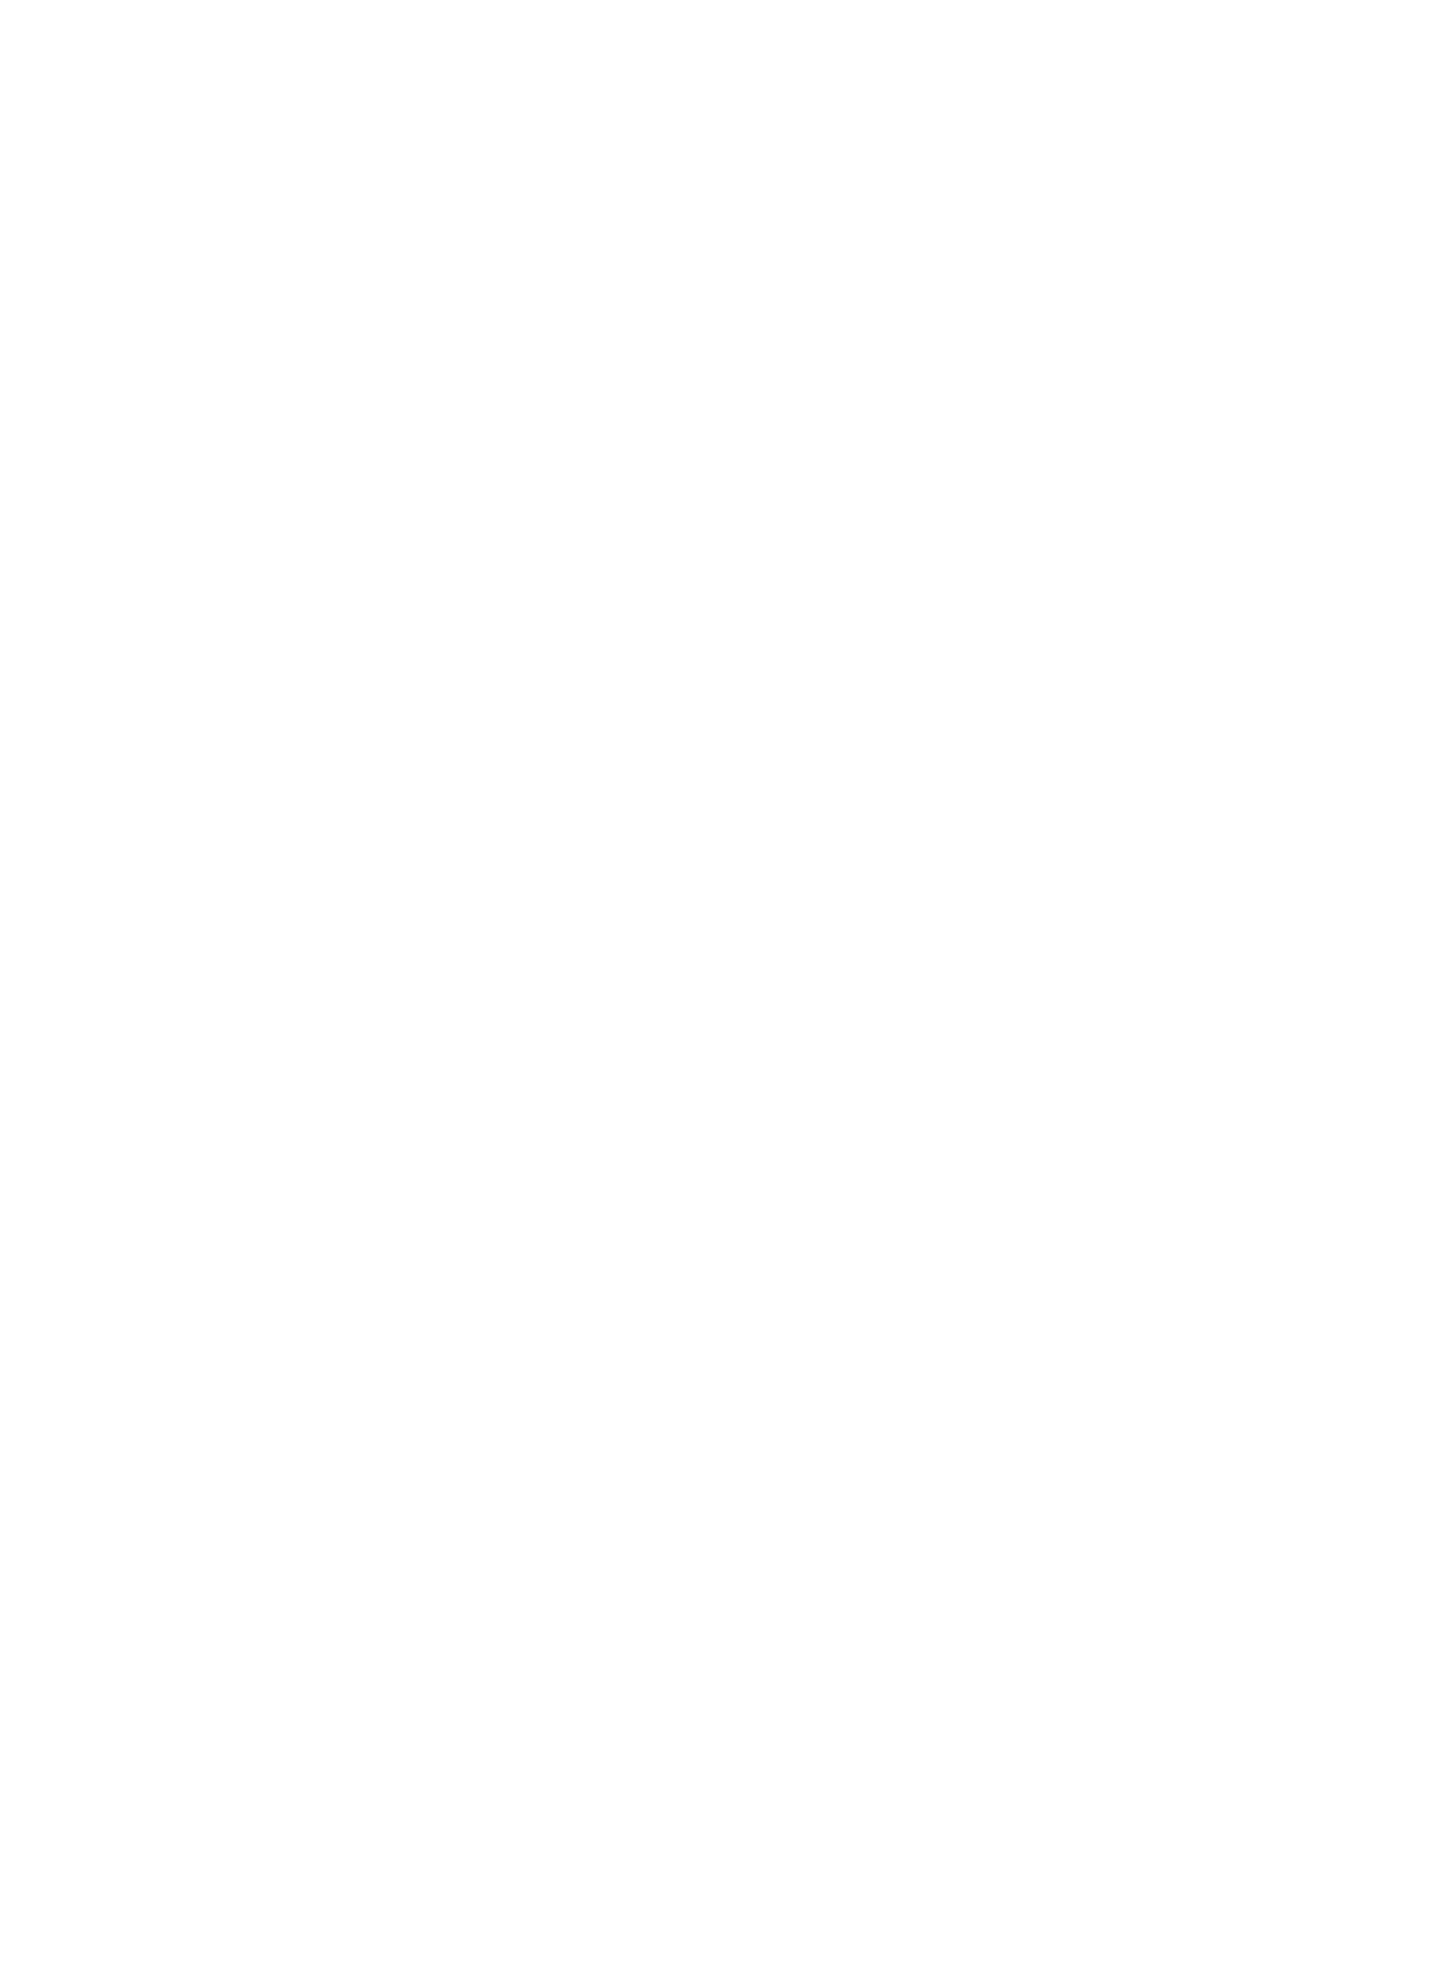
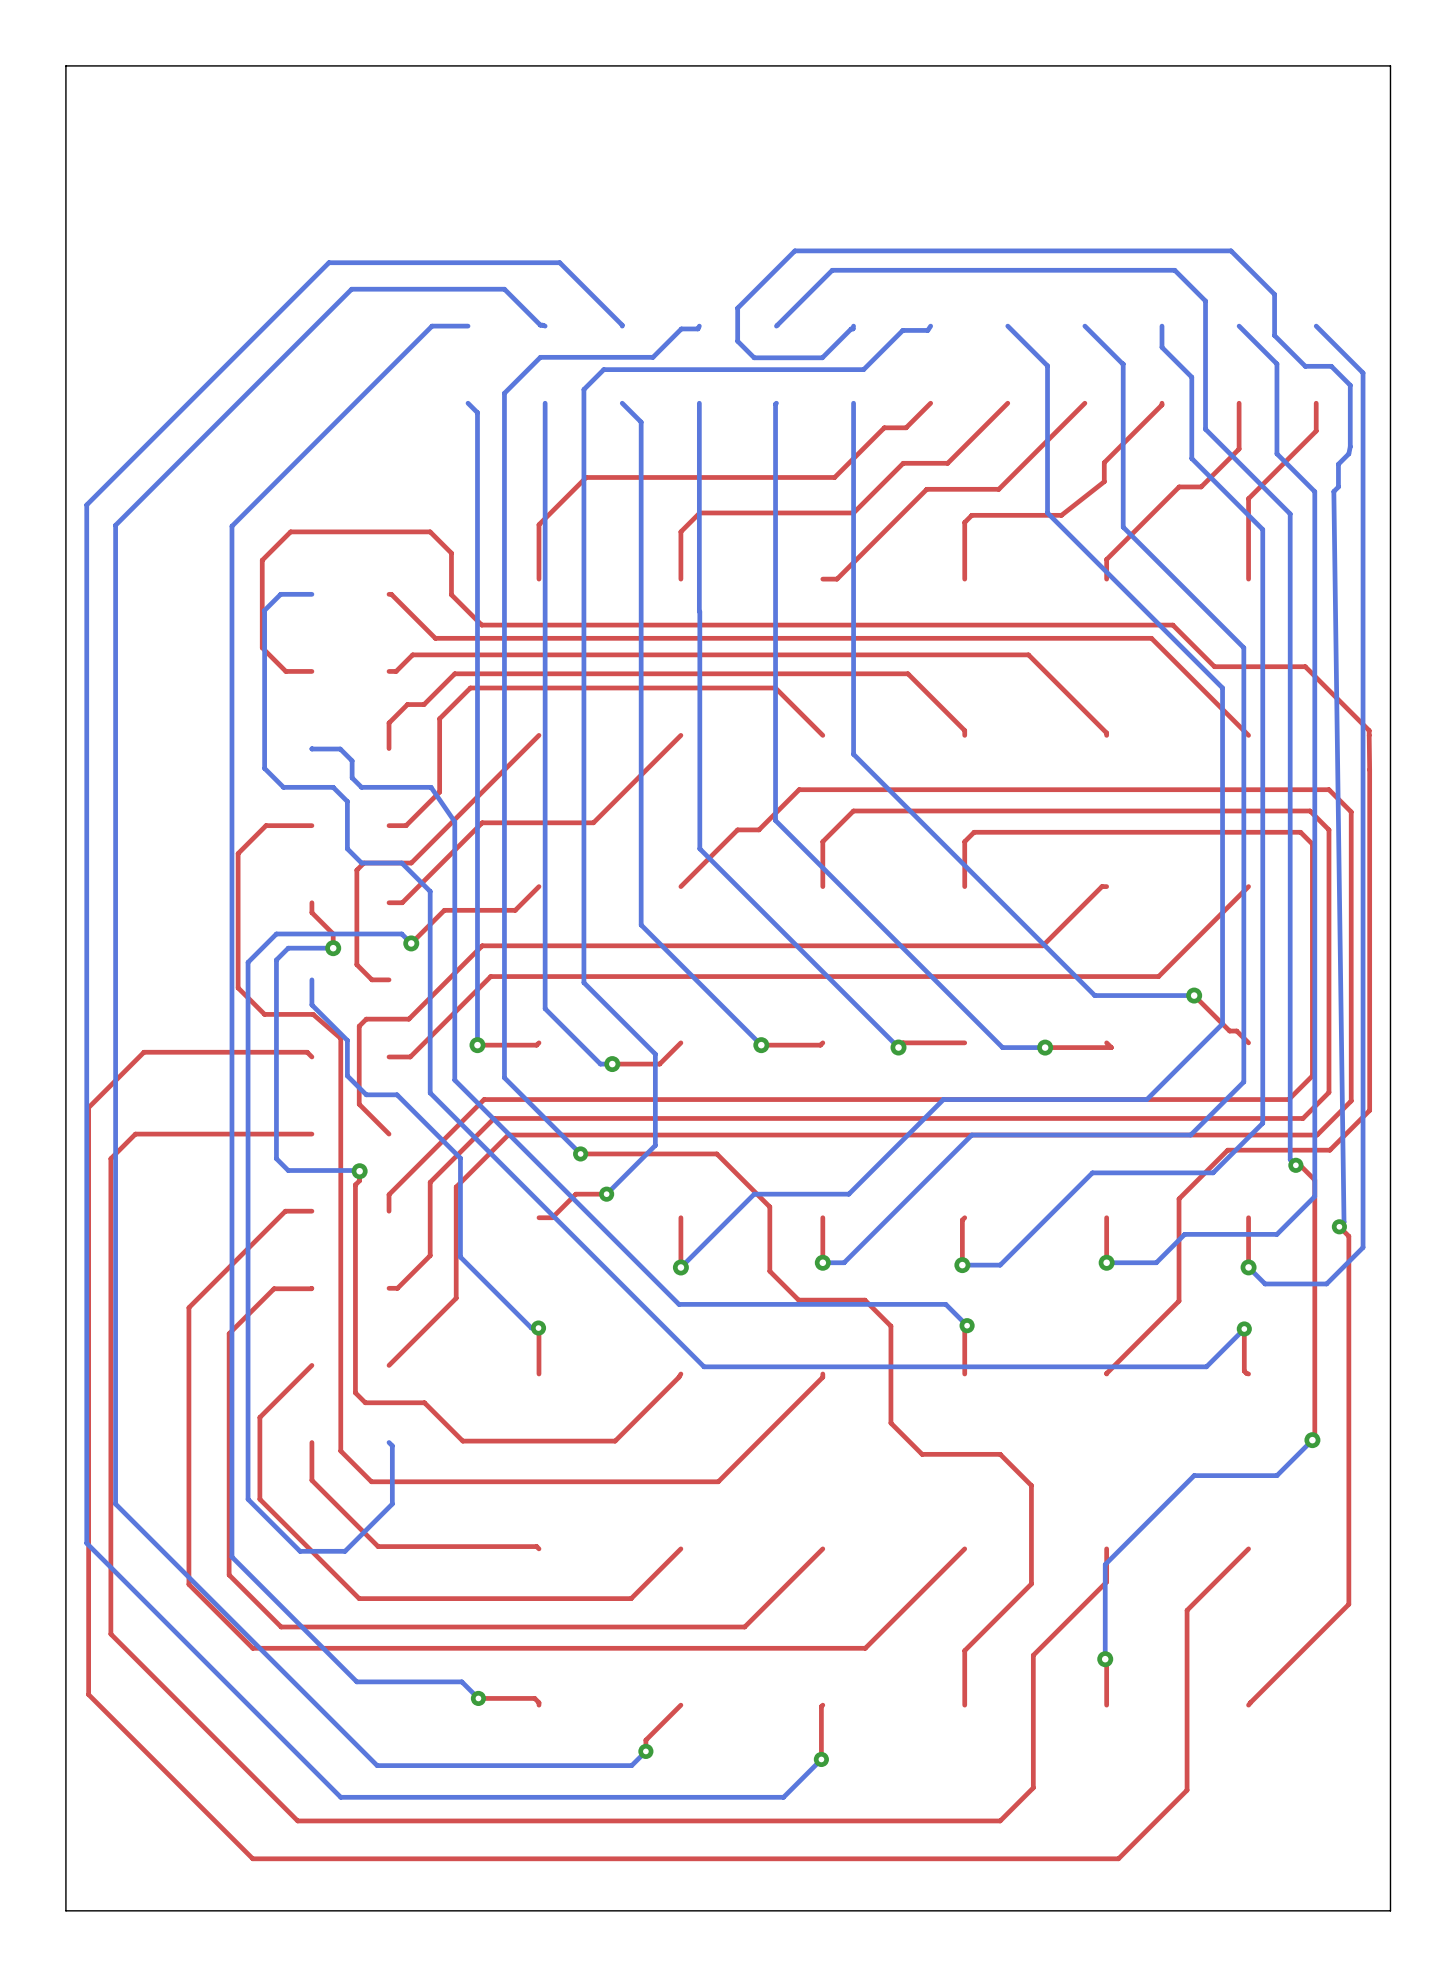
board edge: none -> (1390, 65) (65, 65) (65, 1910) (1390, 1910) (1390, 65)
bottom track: none -> (468, 326) (432, 326) (231, 526) (231, 1557) (356, 1681) (461, 1681) (478, 1698)
bottom track: none -> (545, 326) (540, 325) (504, 289) (351, 289) (115, 525) (115, 1504) (377, 1765) (631, 1765) (645, 1751)
bottom track: none -> (622, 326) (559, 262) (328, 262) (86, 504) (86, 1543) (340, 1797) (783, 1797) (821, 1759)
bottom track: none -> (699, 326) (697, 328) (681, 328) (652, 357) (540, 357) (504, 393) (504, 1077) (580, 1153)
bottom track: none -> (776, 326) (832, 270) (1174, 270) (1205, 301) (1205, 429) (1290, 513) (1290, 1159) (1295, 1165)
bottom track: none -> (853, 326) (853, 328) (822, 357) (754, 357) (737, 341) (737, 308) (794, 250) (1231, 250) (1274, 294) (1274, 335) (1305, 366) (1331, 366) (1350, 385) (1350, 446) (1348, 453) (1338, 464) (1338, 486) (1333, 491) (1344, 1222) (1339, 1226)
bottom track: none -> (930, 326) (927, 330) (902, 330) (863, 369) (603, 369) (583, 389) (583, 982) (655, 1054) (655, 1145) (606, 1194)
bottom track: none -> (1007, 326) (1047, 365) (1047, 512) (1222, 687) (1222, 1023) (1146, 1099) (943, 1099) (848, 1194) (754, 1194) (680, 1267)
bottom track: none -> (1084, 326) (1123, 363) (1123, 527) (1243, 647) (1243, 1081) (1190, 1135) (971, 1135) (844, 1262) (822, 1262)
bottom track: none -> (1161, 326) (1161, 347) (1191, 377) (1191, 458) (1262, 529) (1262, 1123) (1213, 1172) (1092, 1172) (1000, 1265) (962, 1265)
bottom track: none -> (1239, 326) (1276, 363) (1276, 453) (1314, 491) (1314, 1196) (1276, 1234) (1184, 1234) (1156, 1262) (1106, 1262)
bottom track: none -> (1316, 326) (1363, 372) (1363, 1247) (1326, 1283) (1265, 1283) (1248, 1267)
bottom track: none -> (468, 403) (477, 412) (477, 1045)
bottom track: none -> (545, 403) (545, 1008) (600, 1064) (612, 1064)
bottom track: none -> (622, 403) (641, 422) (641, 924) (761, 1045)
bottom track: none -> (699, 403) (699, 848) (898, 1047)
bottom track: none -> (776, 403) (775, 820) (1002, 1047) (1045, 1047)
bottom track: none -> (853, 403) (853, 754) (1094, 995) (1194, 995)
top track: none -> (930, 403) (906, 427) (884, 427) (834, 477) (586, 477) (538, 524) (538, 579)
top track: none -> (1007, 403) (947, 463) (903, 463) (853, 512) (699, 512) (680, 531) (680, 579)
top track: none -> (1084, 403) (998, 489) (926, 489) (837, 579) (822, 579)
top track: none -> (1161, 403) (1104, 462) (1104, 481) (1061, 515) (971, 515) (964, 522) (964, 579)
top track: none -> (1239, 403) (1239, 449) (1201, 486) (1179, 486) (1106, 559) (1106, 579)
top track: none -> (1316, 403) (1316, 431) (1248, 498) (1248, 579)
bottom track: none -> (311, 594) (280, 594) (264, 610) (264, 768) (283, 787) (333, 787) (347, 801) (347, 848) (361, 863) (401, 863) (430, 891) (430, 1092) (704, 1366) (1206, 1366) (1244, 1328)
top track: none -> (389, 594) (391, 594) (435, 638) (1151, 638) (1248, 735)
top track: none -> (311, 671) (285, 671) (262, 647) (262, 560) (290, 531) (430, 531) (451, 553) (451, 594) (481, 625) (1172, 625) (1214, 666) (1305, 666) (1369, 730) (1369, 1110) (1329, 1150) (1227, 1150) (1179, 1198) (1179, 1301) (1106, 1374)
top track: none -> (389, 671) (396, 671) (412, 654) (1028, 654) (1106, 733) (1106, 735)
top track: none -> (538, 735) (411, 863) (363, 863) (356, 870) (356, 964) (371, 979) (389, 979)
top track: none -> (680, 735) (593, 822) (482, 822) (402, 902) (389, 902)
top track: none -> (822, 735) (775, 687) (470, 687) (439, 718) (439, 792) (406, 825) (389, 825)
top track: none -> (964, 735) (964, 730) (907, 673) (454, 673) (424, 704) (407, 704) (389, 723) (389, 748)
bottom track: none -> (311, 748) (340, 749) (352, 760) (352, 777) (361, 787) (431, 787) (454, 821) (454, 1080) (679, 1304) (945, 1304) (967, 1325)
top track: none -> (311, 825) (266, 825) (238, 853) (238, 987) (264, 1014) (313, 1014) (340, 1038) (340, 1451) (371, 1481) (718, 1481) (822, 1377) (822, 1374)
top track: none -> (538, 886) (515, 910) (444, 910) (411, 943)
top track: none -> (680, 886) (737, 829) (758, 829) (799, 789) (1328, 789) (1351, 811) (1351, 1100) (1317, 1135) (508, 1135) (456, 1187) (456, 1298) (389, 1365)
top track: none -> (822, 886) (822, 841) (853, 810) (1310, 810) (1328, 829) (1328, 1092) (1302, 1118) (494, 1118) (430, 1182) (430, 1255) (397, 1288) (389, 1288)
top track: none -> (964, 886) (964, 841) (974, 832) (1300, 832) (1312, 844) (1312, 1075) (1288, 1099) (484, 1099) (389, 1194) (389, 1211)
top track: none -> (1106, 886) (1101, 886) (1042, 945) (482, 945) (408, 1019) (366, 1019) (359, 1026) (359, 1104) (389, 1134)
top track: none -> (1248, 886) (1158, 976) (490, 976) (410, 1056) (389, 1056)
top track: none -> (311, 902) (311, 912) (333, 933) (333, 948)
bottom track: none -> (411, 943) (401, 933) (276, 933) (248, 962) (248, 1499) (300, 1551) (345, 1551) (392, 1504) (392, 1445) (389, 1442)
via: none -> (411, 943)
bottom track: none -> (333, 948) (288, 948) (276, 960) (276, 1158) (288, 1170) (359, 1171)
via: none -> (333, 948)
bottom track: none -> (311, 979) (311, 1004) (347, 1040) (347, 1075) (366, 1094) (397, 1094) (460, 1158) (460, 1257) (531, 1328) (538, 1328)
top track: none -> (1194, 995) (1229, 1031) (1236, 1031) (1248, 1042)
via: none -> (1194, 995)
top track: none -> (538, 1042) (536, 1045) (477, 1045)
top track: none -> (680, 1042) (659, 1064) (612, 1064)
top track: none -> (822, 1042) (820, 1045) (761, 1045)
top track: none -> (964, 1042) (903, 1042) (898, 1047)
top track: none -> (1106, 1042) (1111, 1047) (1045, 1047)
via: none -> (477, 1045)
via: none -> (761, 1045)
via: none -> (898, 1047)
via: none -> (1045, 1047)
top track: none -> (311, 1056) (307, 1052) (143, 1052) (88, 1107) (88, 1694) (252, 1858) (1118, 1858) (1187, 1790) (1187, 1610) (1248, 1548)
via: none -> (612, 1064)
top track: none -> (311, 1134) (135, 1134) (110, 1158) (110, 1634) (297, 1820) (1000, 1820) (1033, 1787) (1033, 1655) (1106, 1581) (1106, 1548)
top track: none -> (580, 1153) (716, 1153) (769, 1206) (769, 1271) (798, 1300) (864, 1300) (890, 1326) (890, 1423) (922, 1454) (1000, 1454) (1031, 1485) (1031, 1583) (964, 1650) (964, 1705)
via: none -> (580, 1153)
top track: none -> (1295, 1165) (1300, 1165) (1314, 1179) (1314, 1437) (1312, 1440)
via: none -> (1295, 1165)
top track: none -> (359, 1171) (359, 1180) (355, 1184) (355, 1392) (365, 1402) (424, 1402) (462, 1441) (615, 1441) (680, 1374)
via: none -> (359, 1171)
top track: none -> (606, 1194) (575, 1194) (552, 1217) (538, 1217)
via: none -> (606, 1194)
top track: none -> (311, 1211) (285, 1211) (188, 1307) (188, 1584) (252, 1648) (865, 1648) (964, 1548)
top track: none -> (680, 1217) (680, 1267)
top track: none -> (822, 1217) (822, 1262)
top track: none -> (964, 1217) (962, 1220) (962, 1265)
top track: none -> (1106, 1217) (1106, 1262)
top track: none -> (1248, 1217) (1248, 1267)
top track: none -> (1339, 1226) (1348, 1236) (1348, 1604) (1248, 1705)
via: none -> (1339, 1226)
via: none -> (822, 1262)
via: none -> (1106, 1262)
via: none -> (962, 1265)
via: none -> (680, 1267)
via: none -> (1248, 1267)
top track: none -> (311, 1288) (274, 1288) (229, 1333) (229, 1574) (281, 1627) (744, 1627) (822, 1548)
top track: none -> (967, 1325) (964, 1328) (964, 1374)
via: none -> (967, 1325)
top track: none -> (538, 1328) (538, 1374)
via: none -> (538, 1328)
top track: none -> (1244, 1328) (1244, 1371) (1248, 1374)
via: none -> (1244, 1328)
top track: none -> (311, 1365) (259, 1417) (259, 1499) (359, 1598) (631, 1598) (680, 1548)
bottom track: none -> (1312, 1440) (1276, 1475) (1194, 1475) (1105, 1564) (1105, 1659)
via: none -> (1312, 1440)
top track: none -> (311, 1442) (311, 1480) (378, 1546) (536, 1546) (538, 1548)
top track: none -> (1105, 1659) (1106, 1705)
via: none -> (1105, 1659)
top track: none -> (478, 1698) (534, 1698) (538, 1705)
via: none -> (478, 1698)
top track: none -> (680, 1705) (645, 1740) (645, 1751)
top track: none -> (822, 1705) (821, 1759)
via: none -> (645, 1751)
via: none -> (821, 1759)

